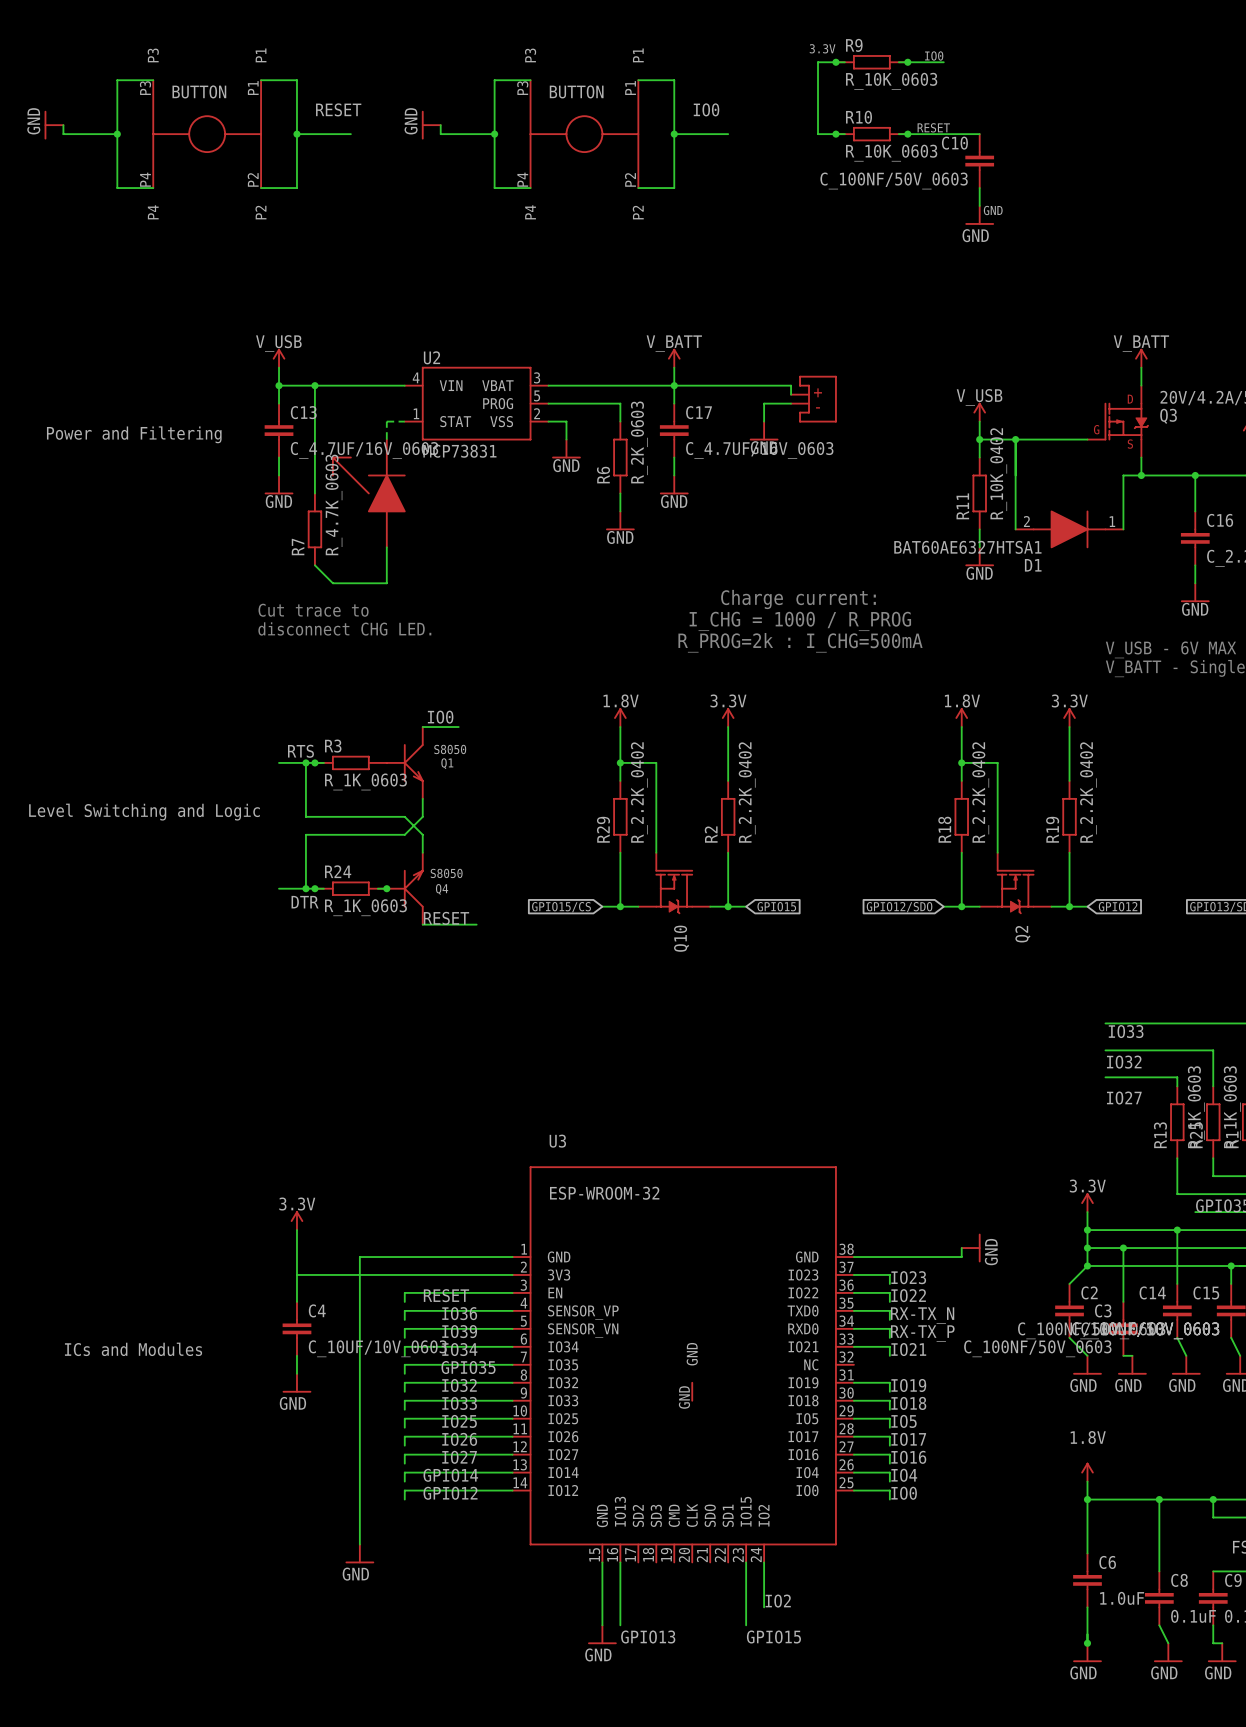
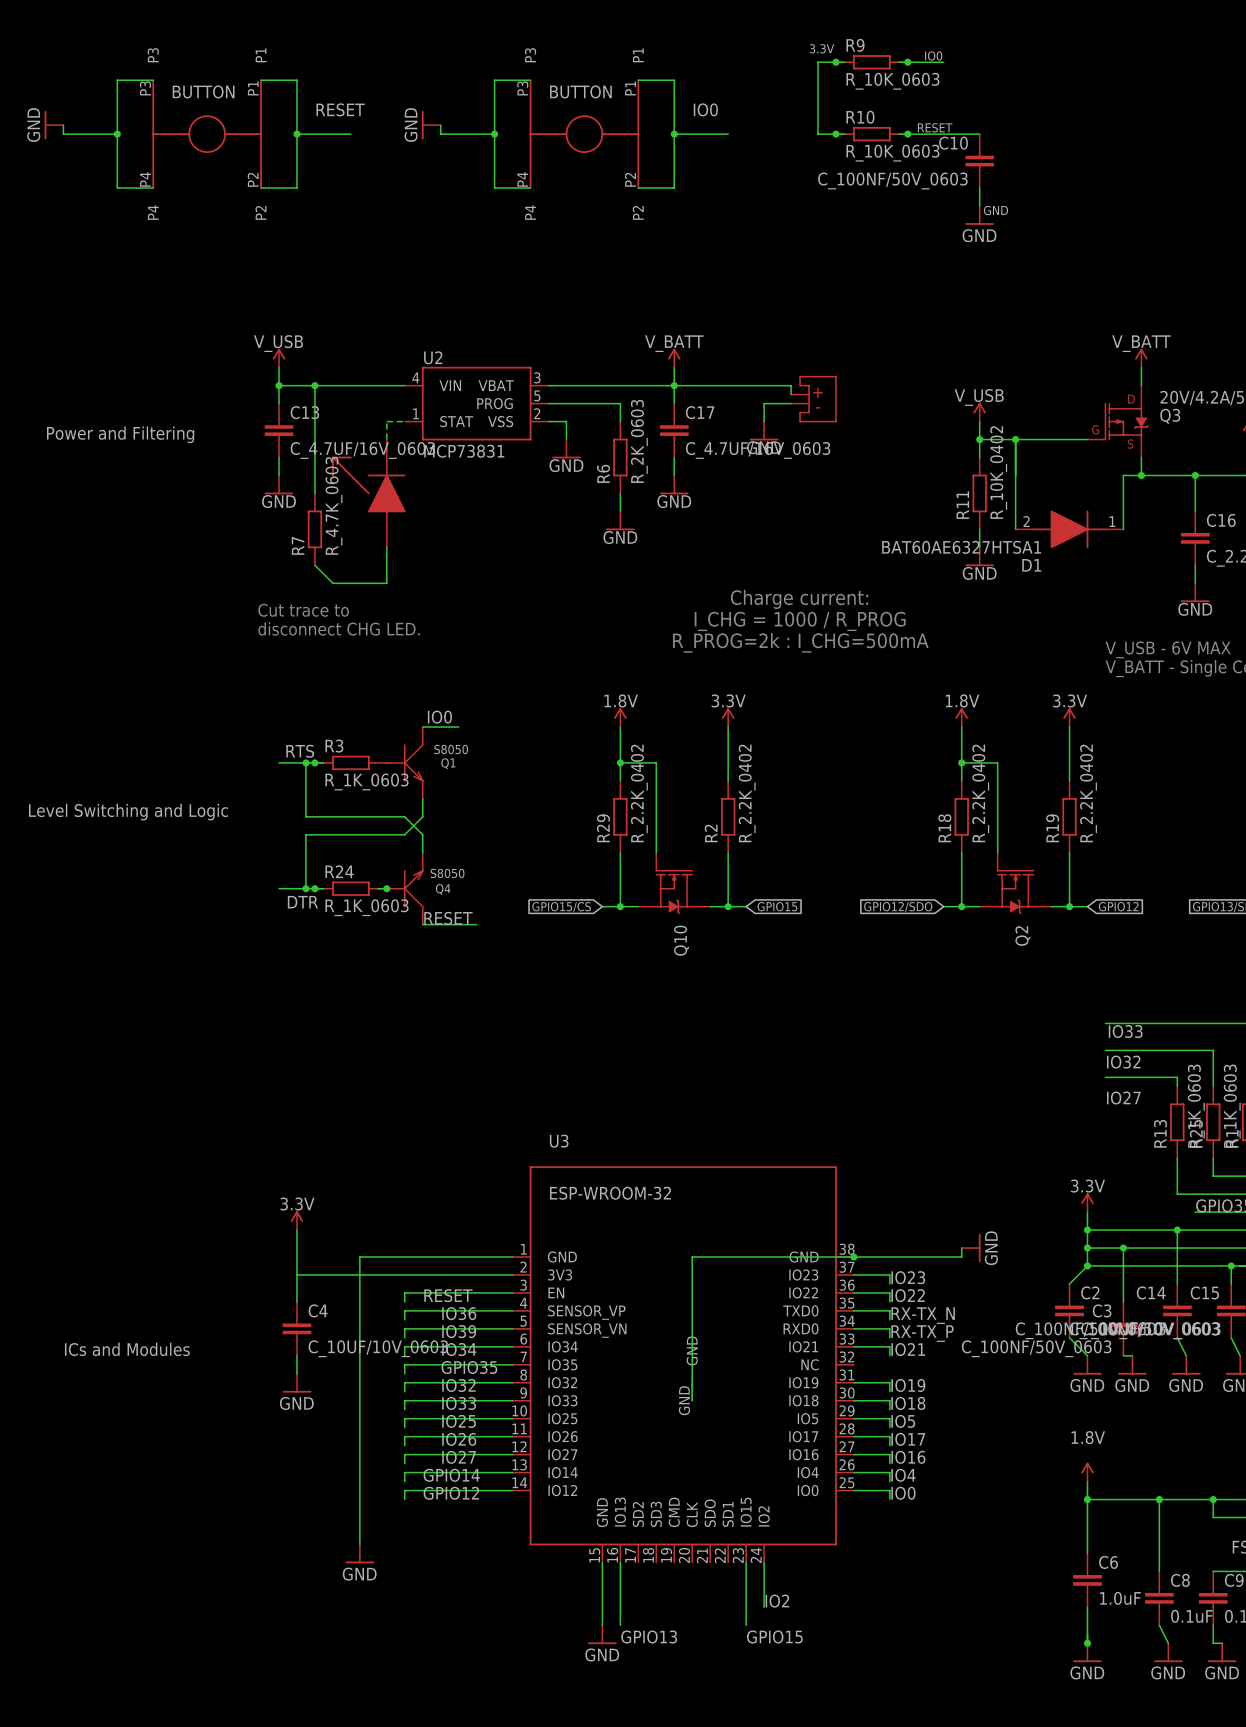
wire: none -> (853, 1257) (692, 1257) (692, 1400)
junction: none -> (853, 1257)

